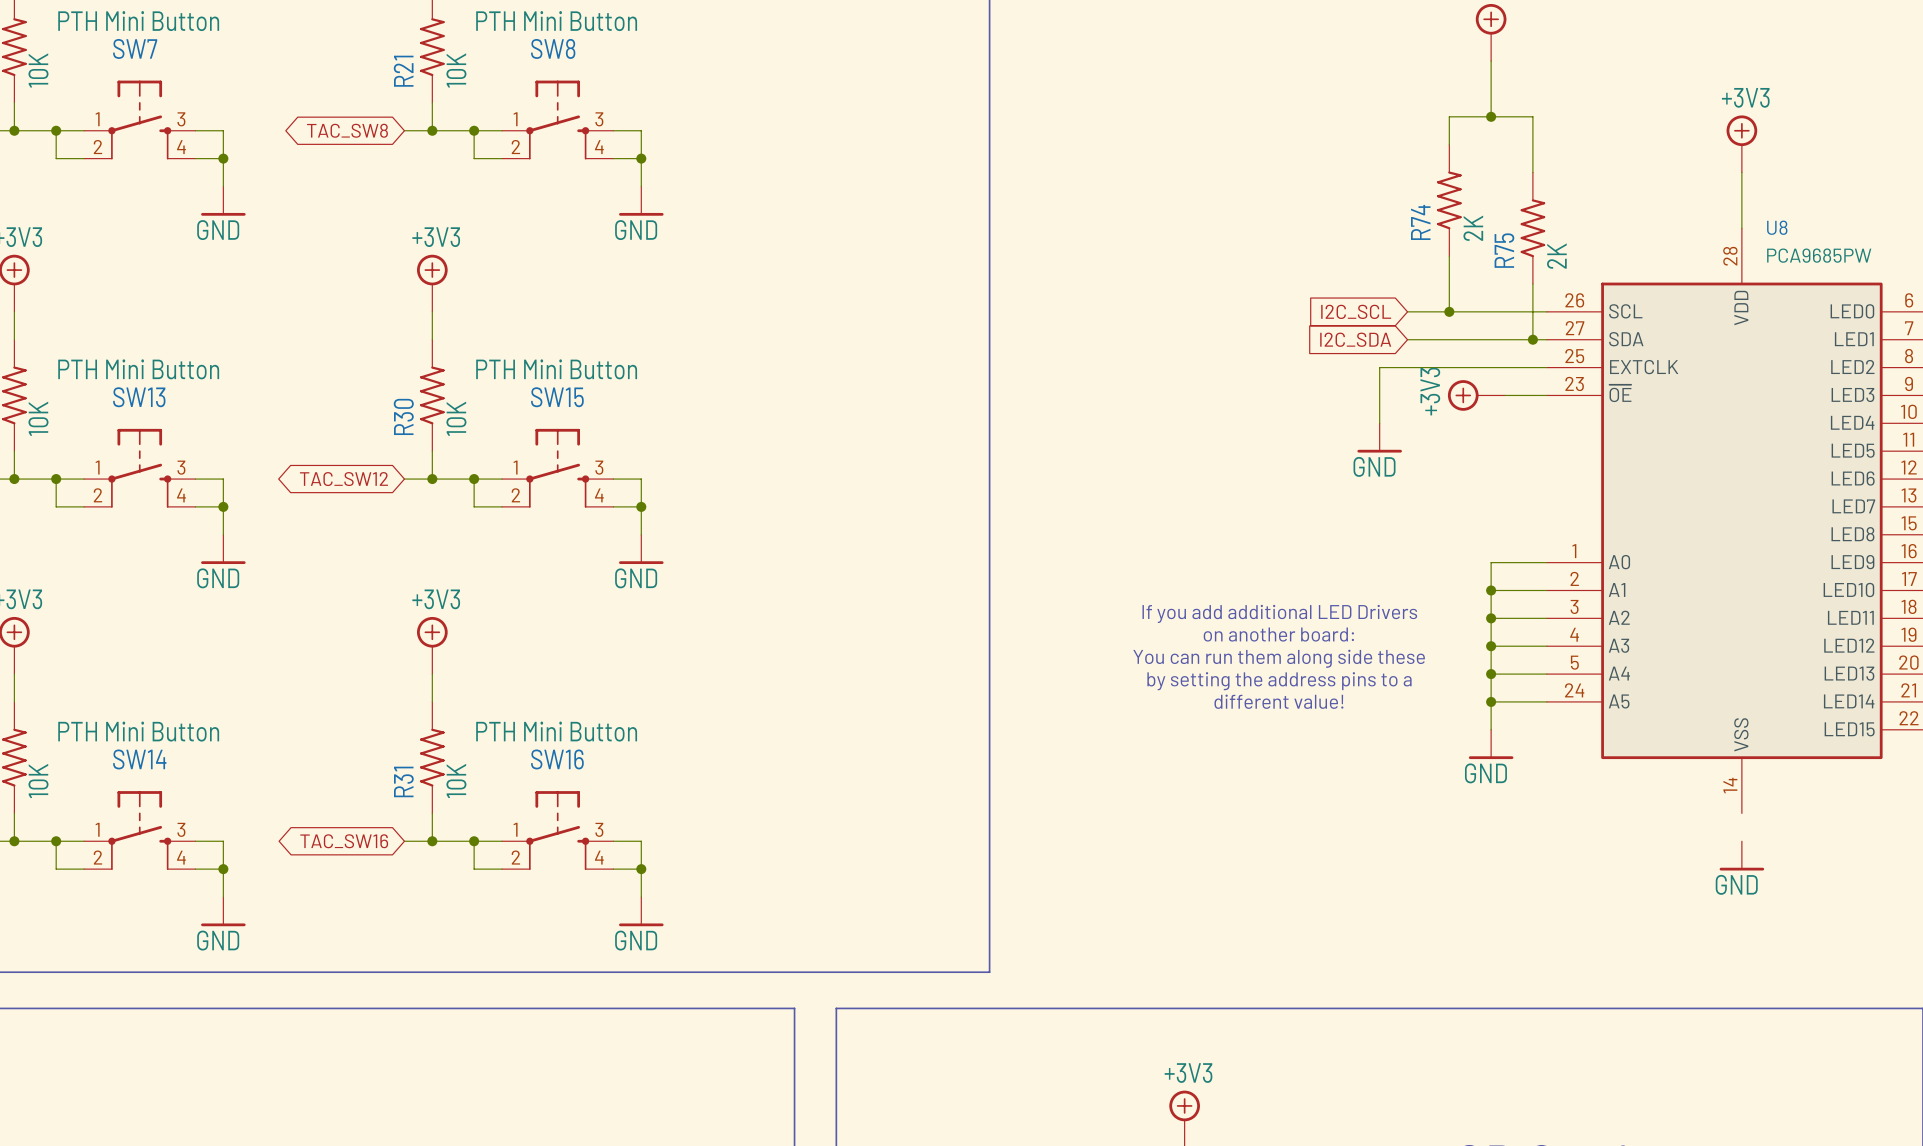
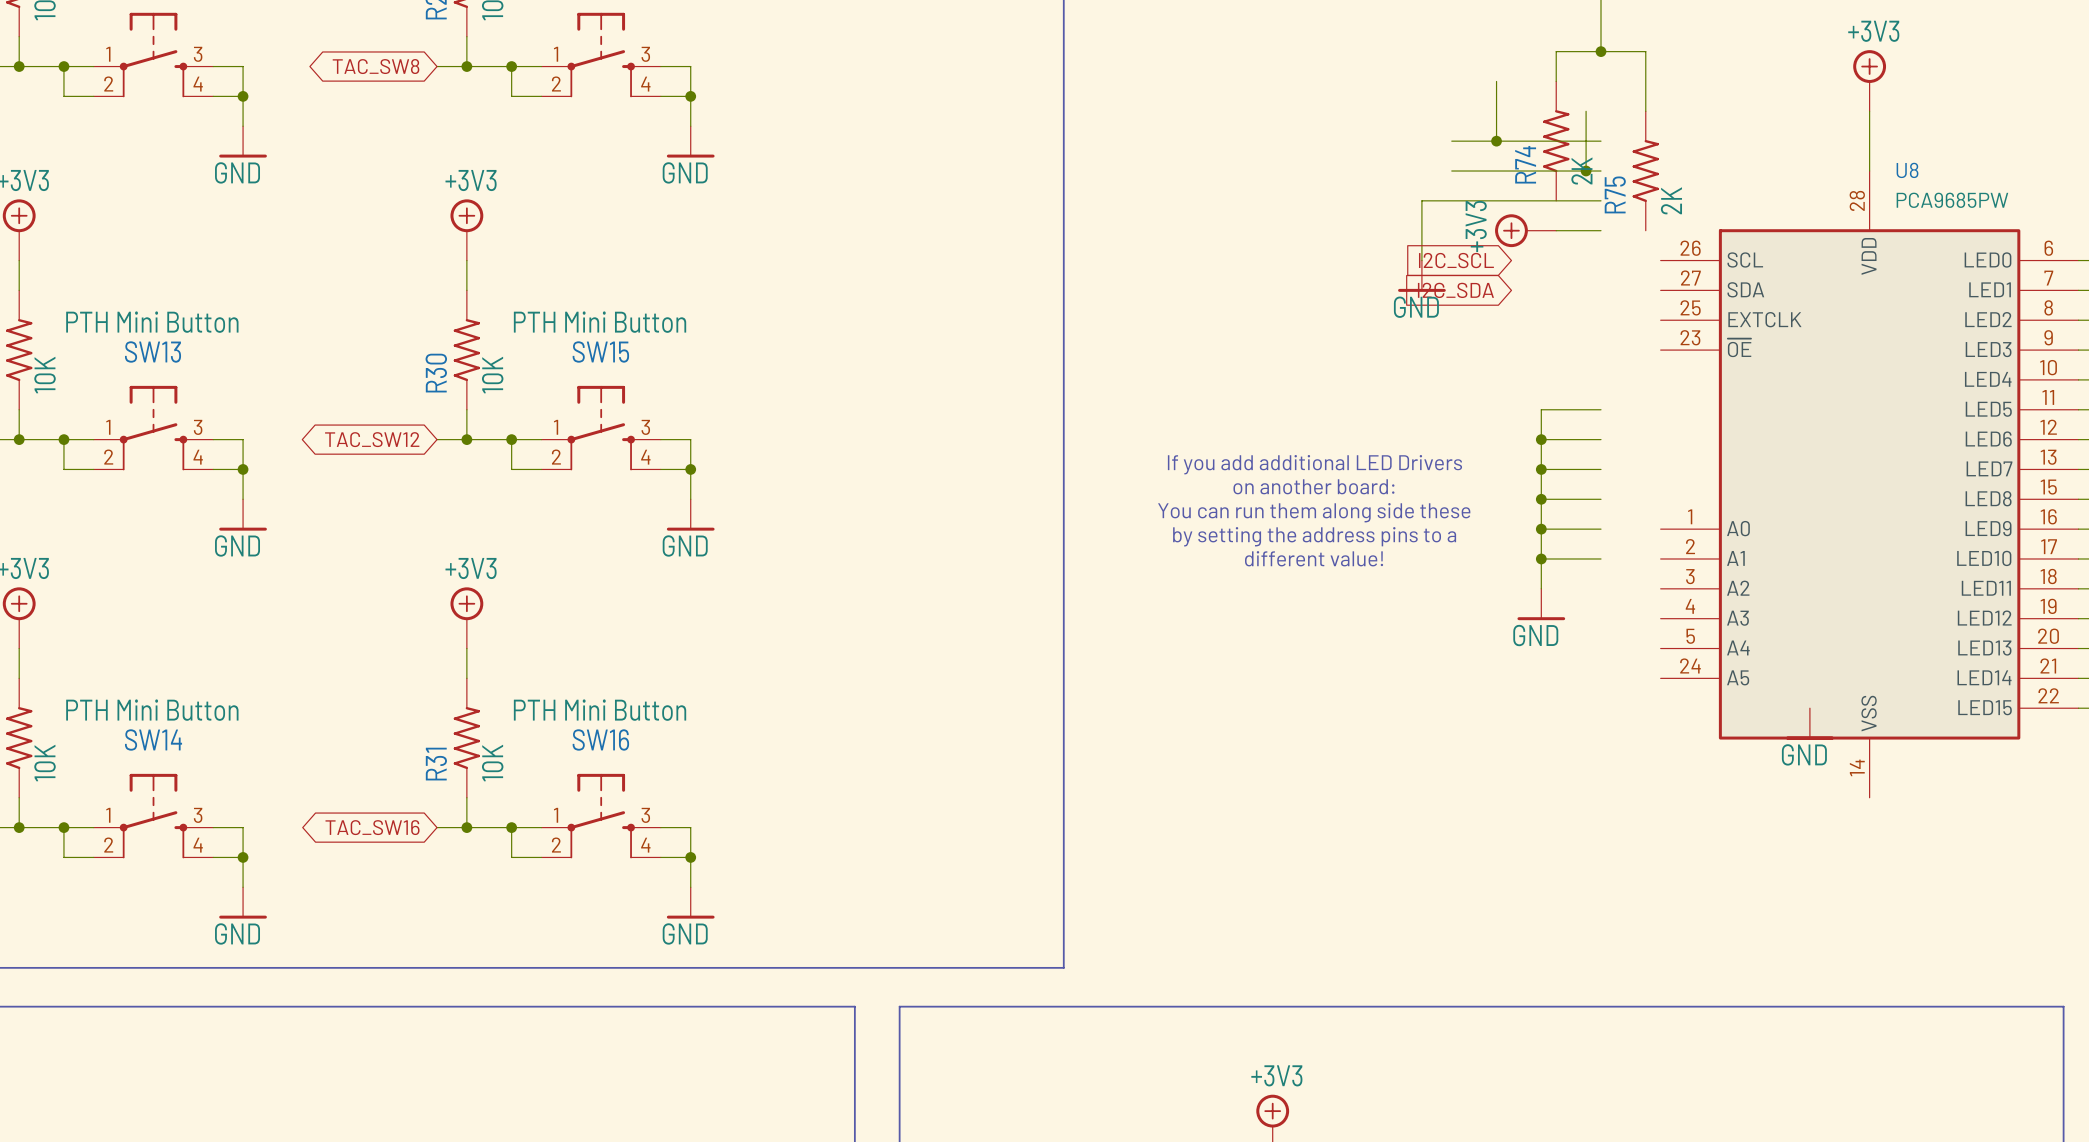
junction: none -> (1496, 141)
junction: none -> (1586, 171)
wire: (1449, 256) (1449, 311) -> (1496, 81) (1496, 141)
wire: (1532, 284) (1532, 339) -> (1586, 111) (1586, 171)
wire: (1407, 311) (1546, 311) -> (1451, 141) (1601, 141)
junction: (1449, 311) -> none
power symbol: none -> GND (1421, 276)
wire: (1407, 339) (1546, 339) -> (1451, 171) (1601, 171)
junction: (1532, 339) -> none
wire: (1546, 367) (1379, 367) (1379, 423) -> (1601, 200) (1421, 200) (1421, 260)
power symbol position: +3V3 (1476, 395) -> +3V3 (1525, 230)
wire: (1505, 395) (1546, 395) -> (1556, 230) (1601, 230)
power symbol: GND (1379, 437) -> none
junction: none -> (1541, 439)
junction: none -> (1541, 469)
junction: none -> (1541, 499)
junction: none -> (1541, 529)
wire: (1546, 562) (1491, 562) (1491, 729) -> (1601, 409) (1541, 409) (1541, 588)
junction: none -> (1541, 558)
wire: (1491, 590) (1546, 590) -> (1601, 558) (1541, 558)
junction: (1491, 590) -> none
text position: If you add additional LED Drivers (1279, 613) -> If you add additional LED Drivers (1314, 464)
wire: (1491, 618) (1546, 618) -> (1541, 469) (1601, 469)
junction: (1491, 618) -> none
power symbol: none -> GND (1541, 604)
text position: on another board: (1278, 634) -> on another board: (1313, 486)
wire: (1491, 646) (1546, 646) -> (1541, 499) (1601, 499)
junction: (1491, 646) -> none
text position: You can run them along side these (1279, 658) -> You can run them along side these (1314, 512)
wire: (1491, 674) (1546, 674) -> (1541, 529) (1601, 529)
junction: (1491, 674) -> none
text position: by setting the address pins to a (1279, 681) -> by setting the address pins to a (1314, 536)
text position: different value! (1278, 701) -> different value! (1314, 558)
wire: (1491, 701) (1546, 701) -> (1541, 439) (1601, 439)
junction: (1491, 701) -> none
power symbol: GND (1491, 744) -> none
power symbol: none -> GND (1809, 723)
power symbol: GND (1741, 855) -> none

